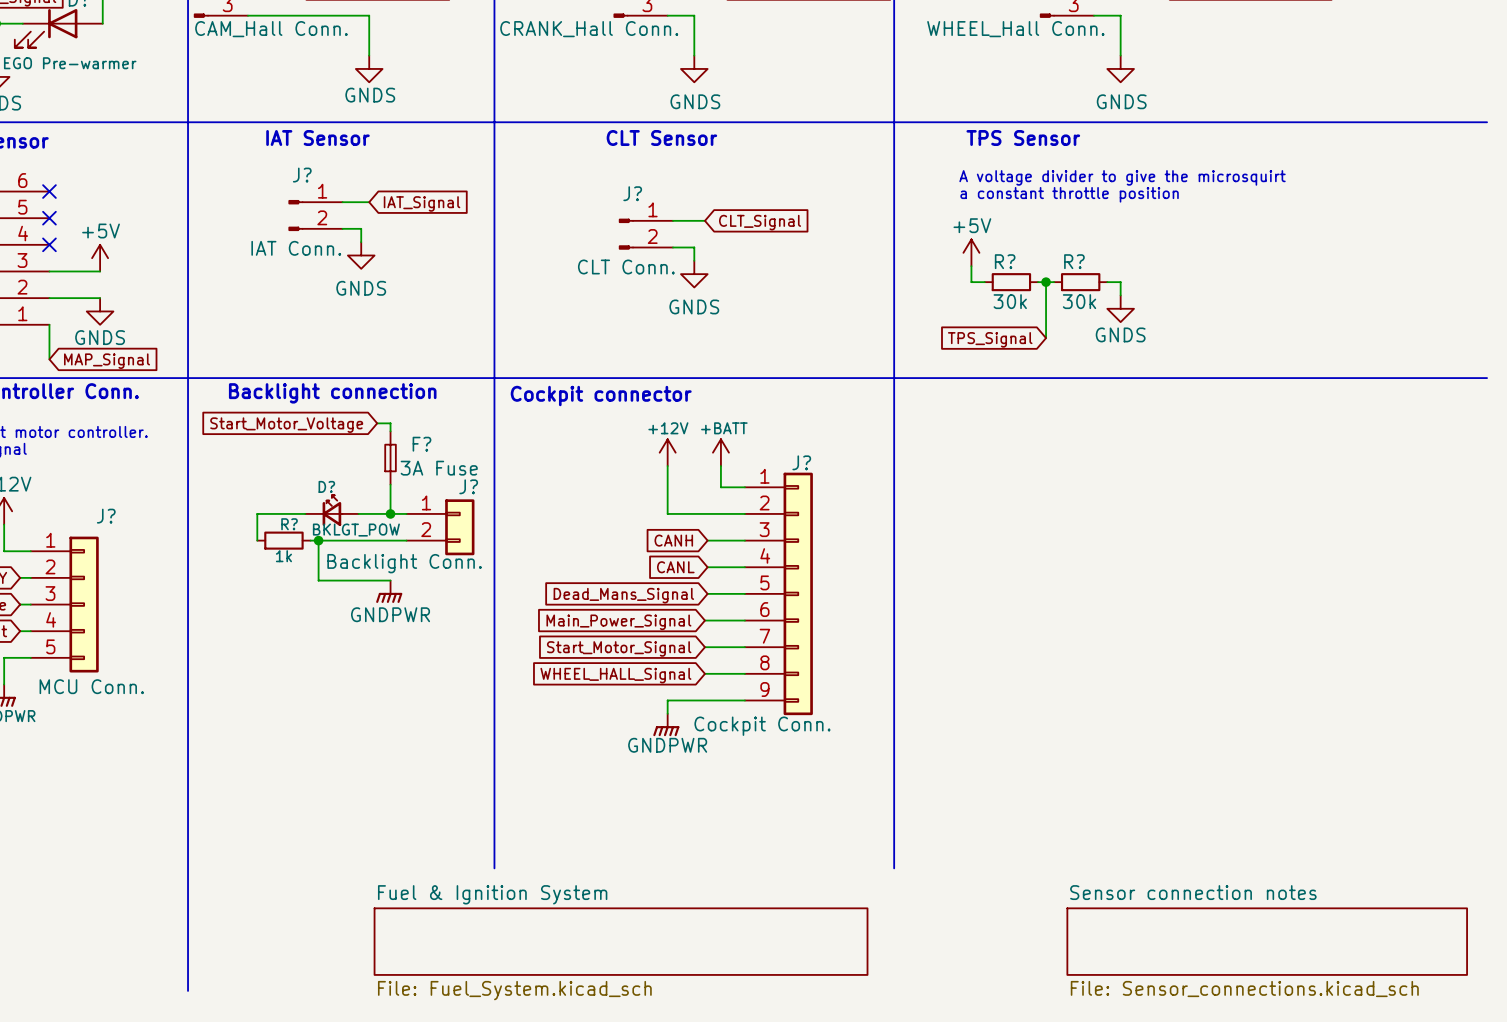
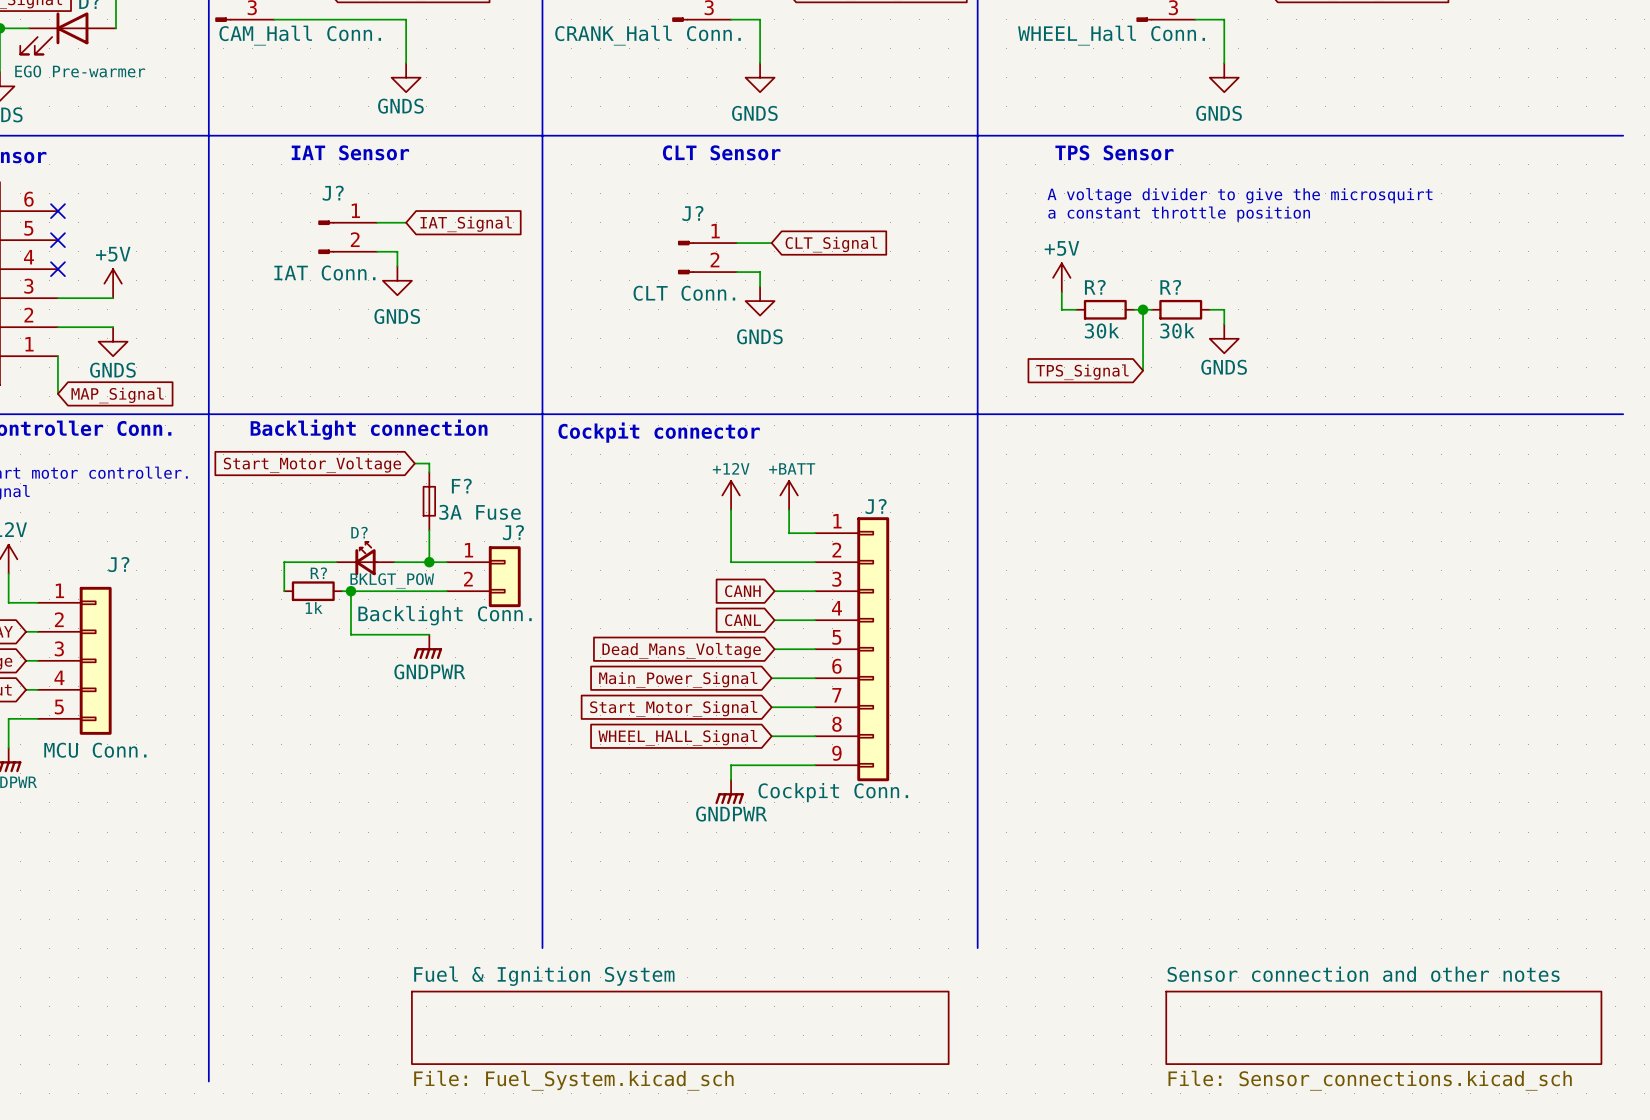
global label: Dead_Mans_Signal (623, 595) -> Dead_Mans_Voltage (681, 650)
sheet Sensor connection notes name: Sensor connection notes (1193, 892) -> Sensor connection and other notes (1363, 974)

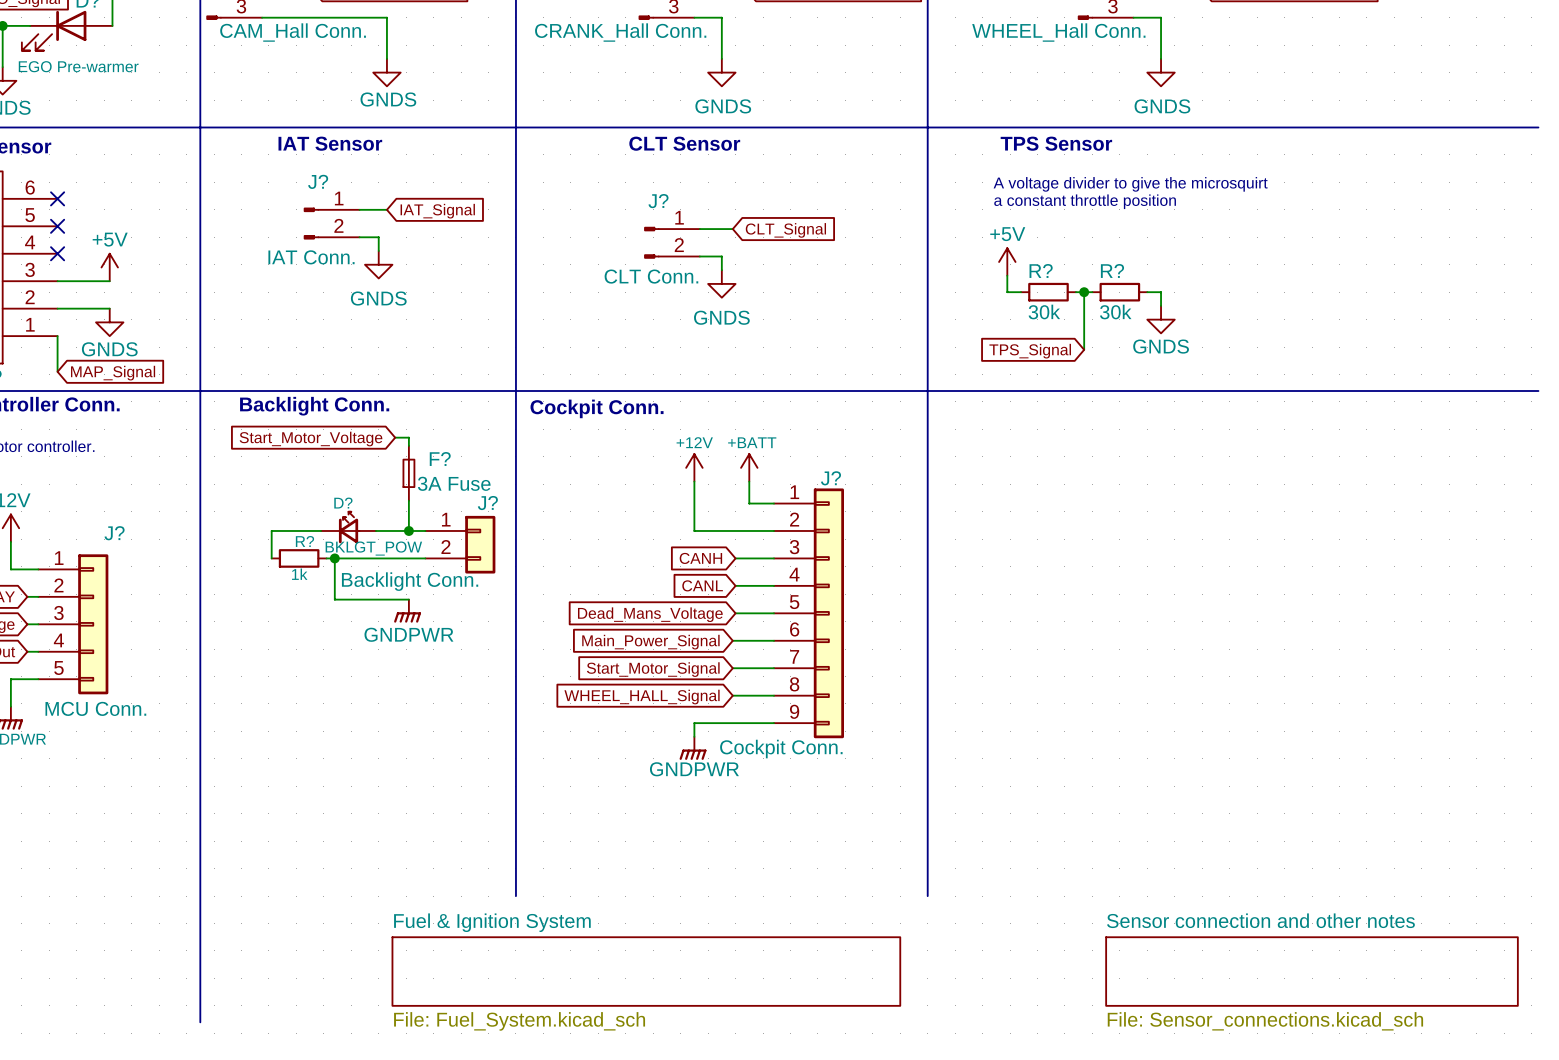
text: Backlight connection (369, 429) -> Backlight Conn. (314, 406)
text: Cockpit connector (659, 432) -> Cockpit Conn. (597, 408)

